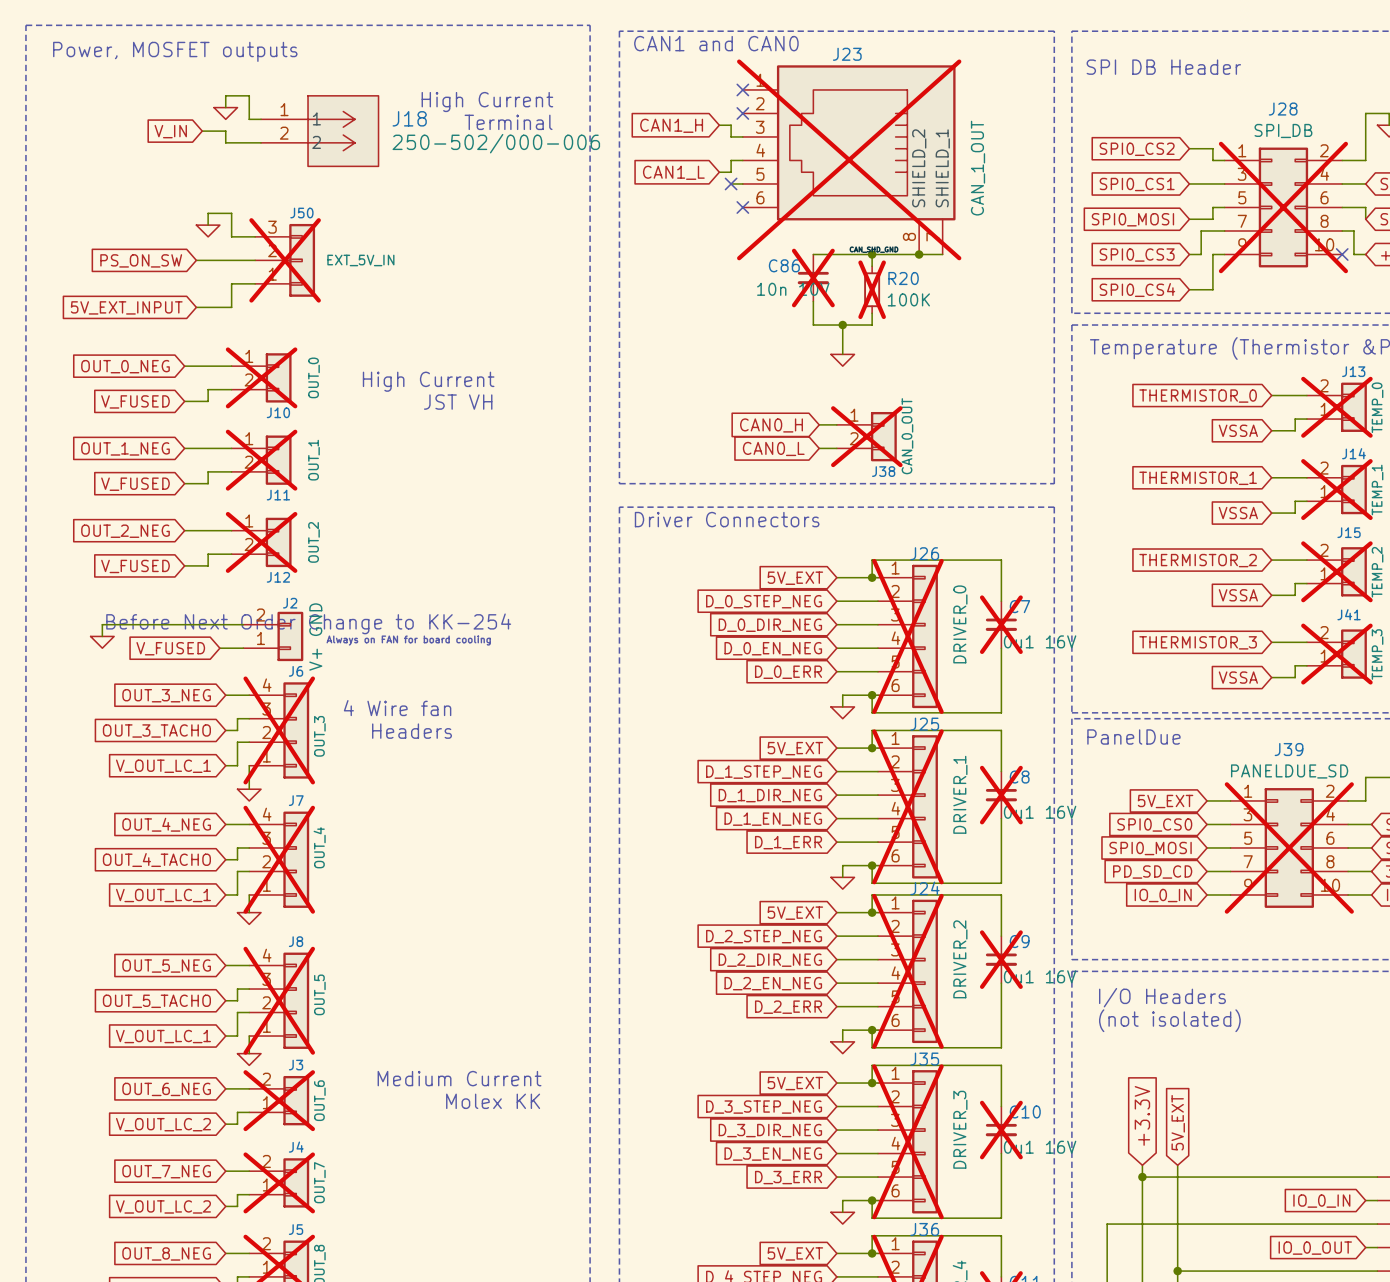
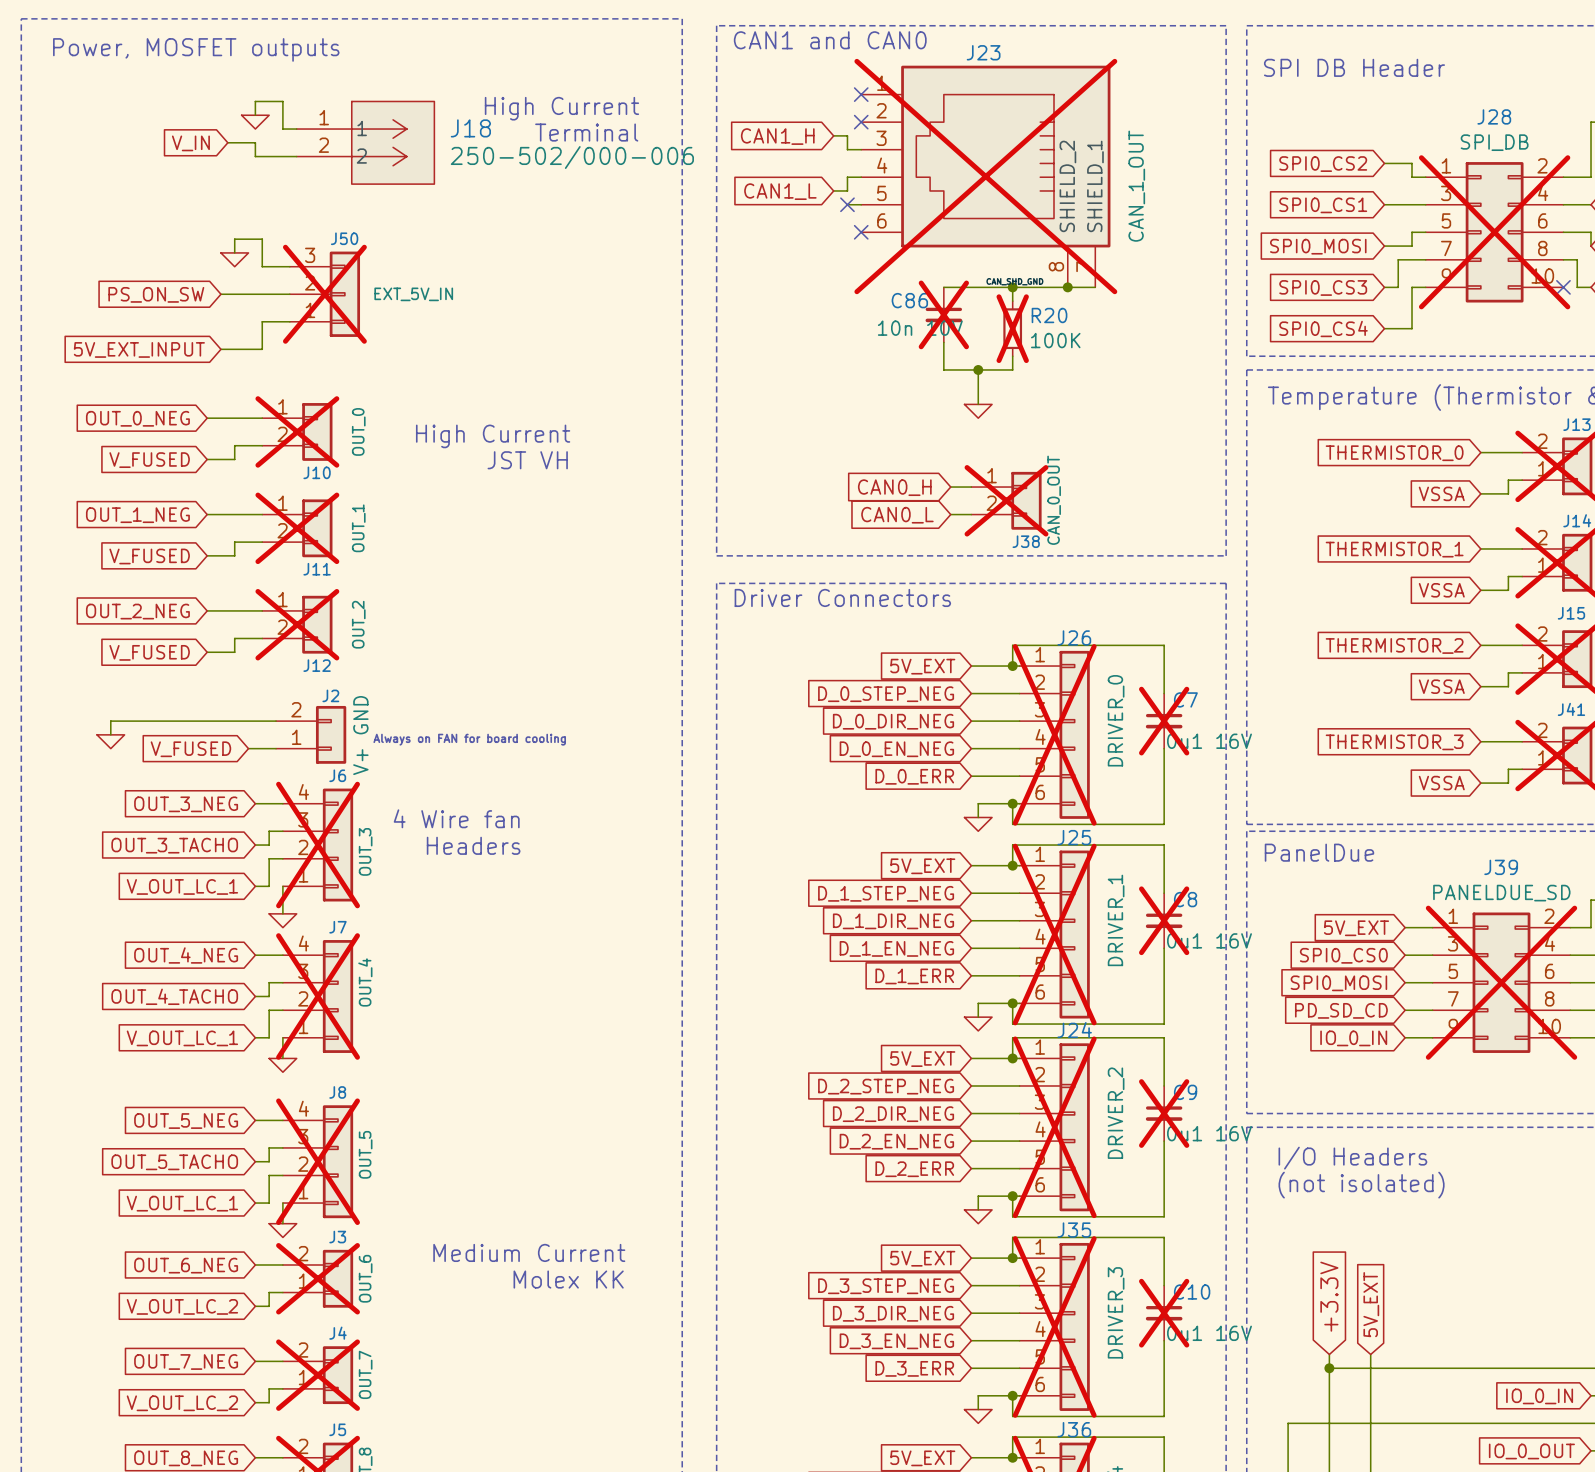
text: Before Next Order Change to KK-254 (308, 623) -> none

